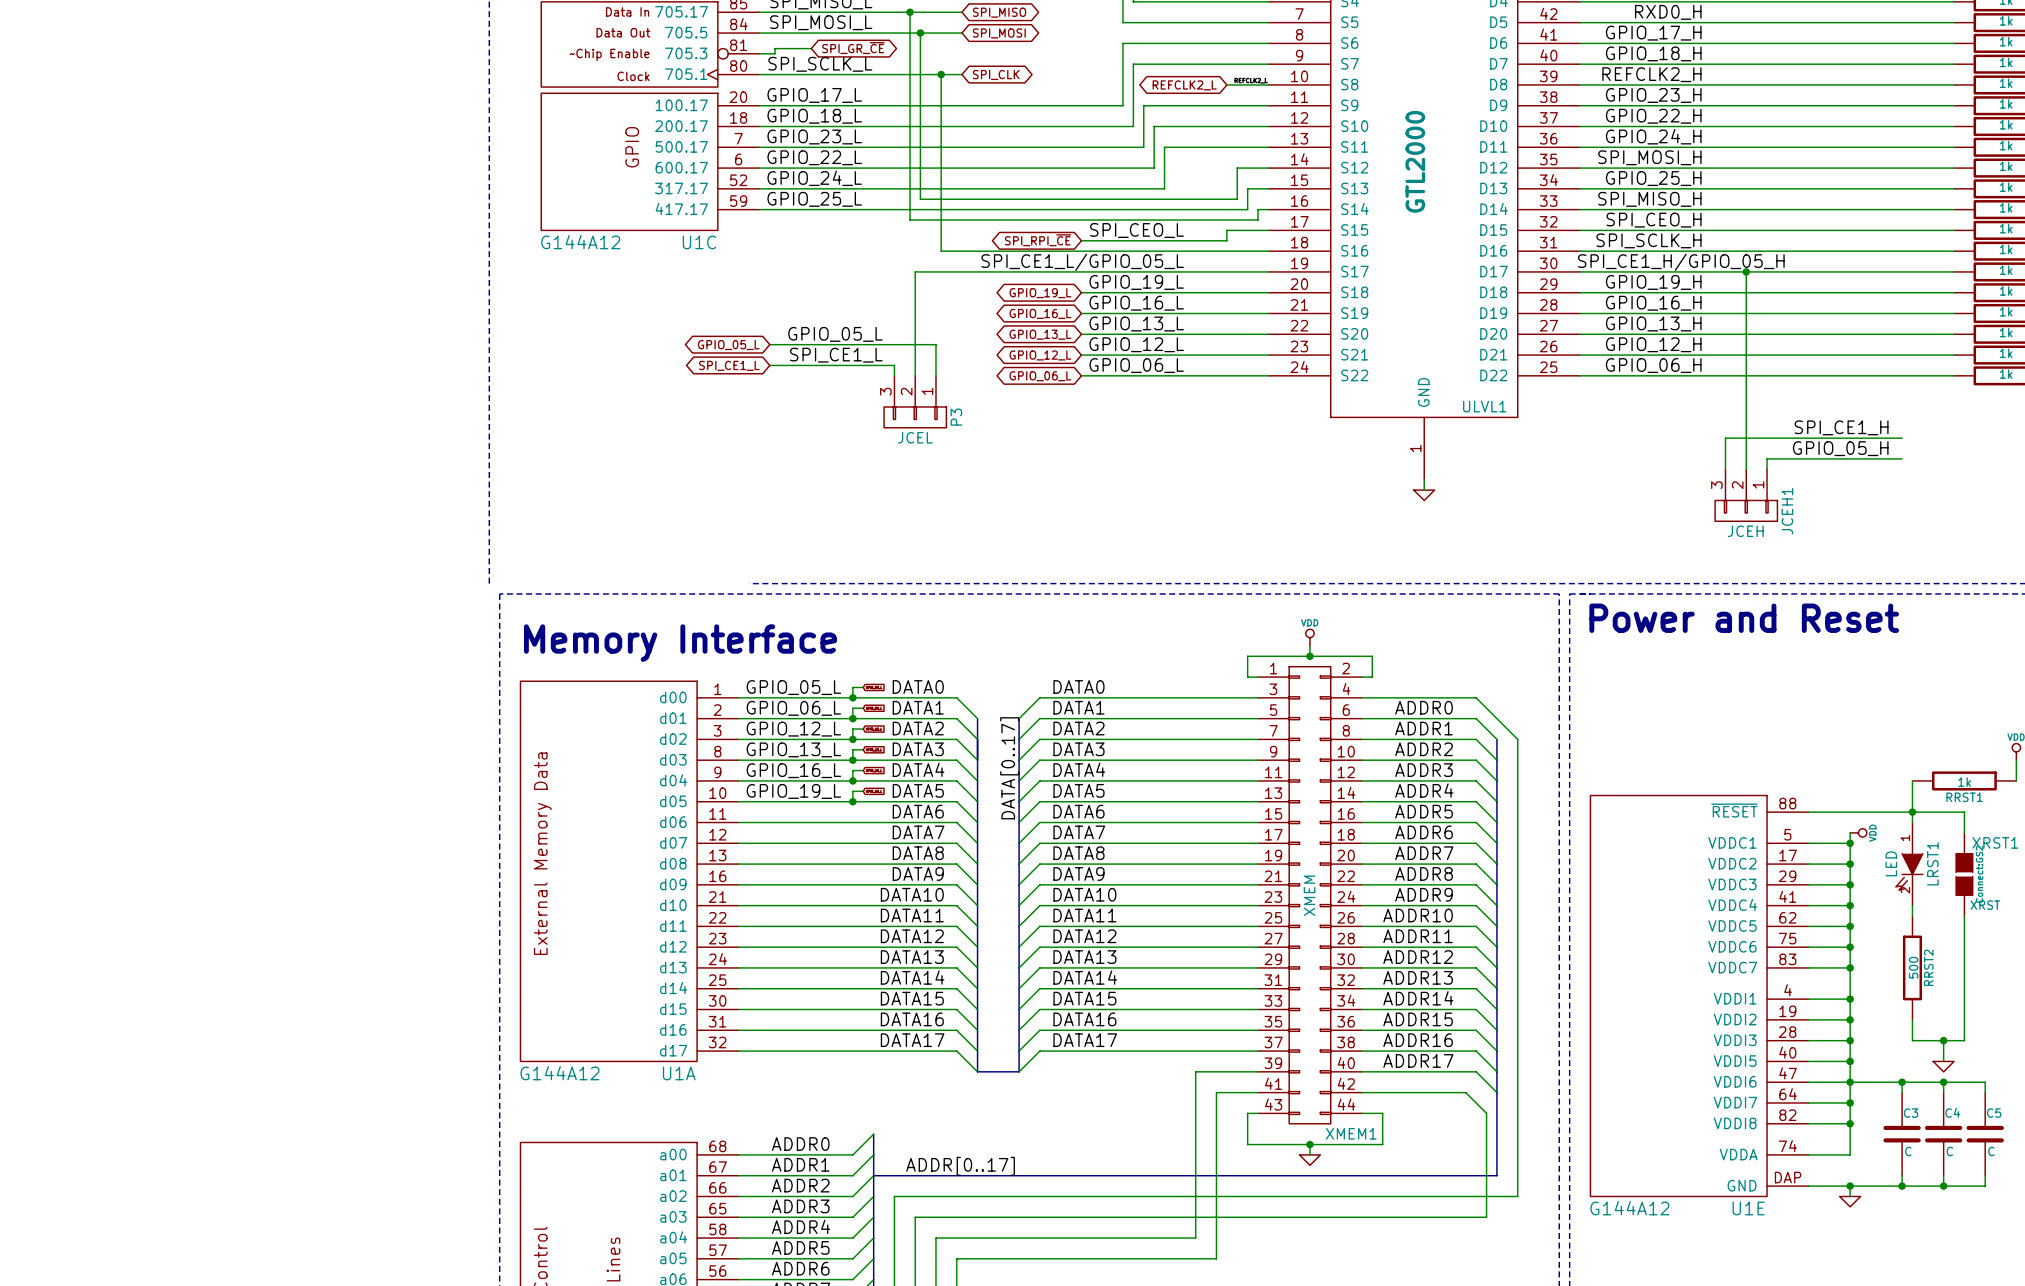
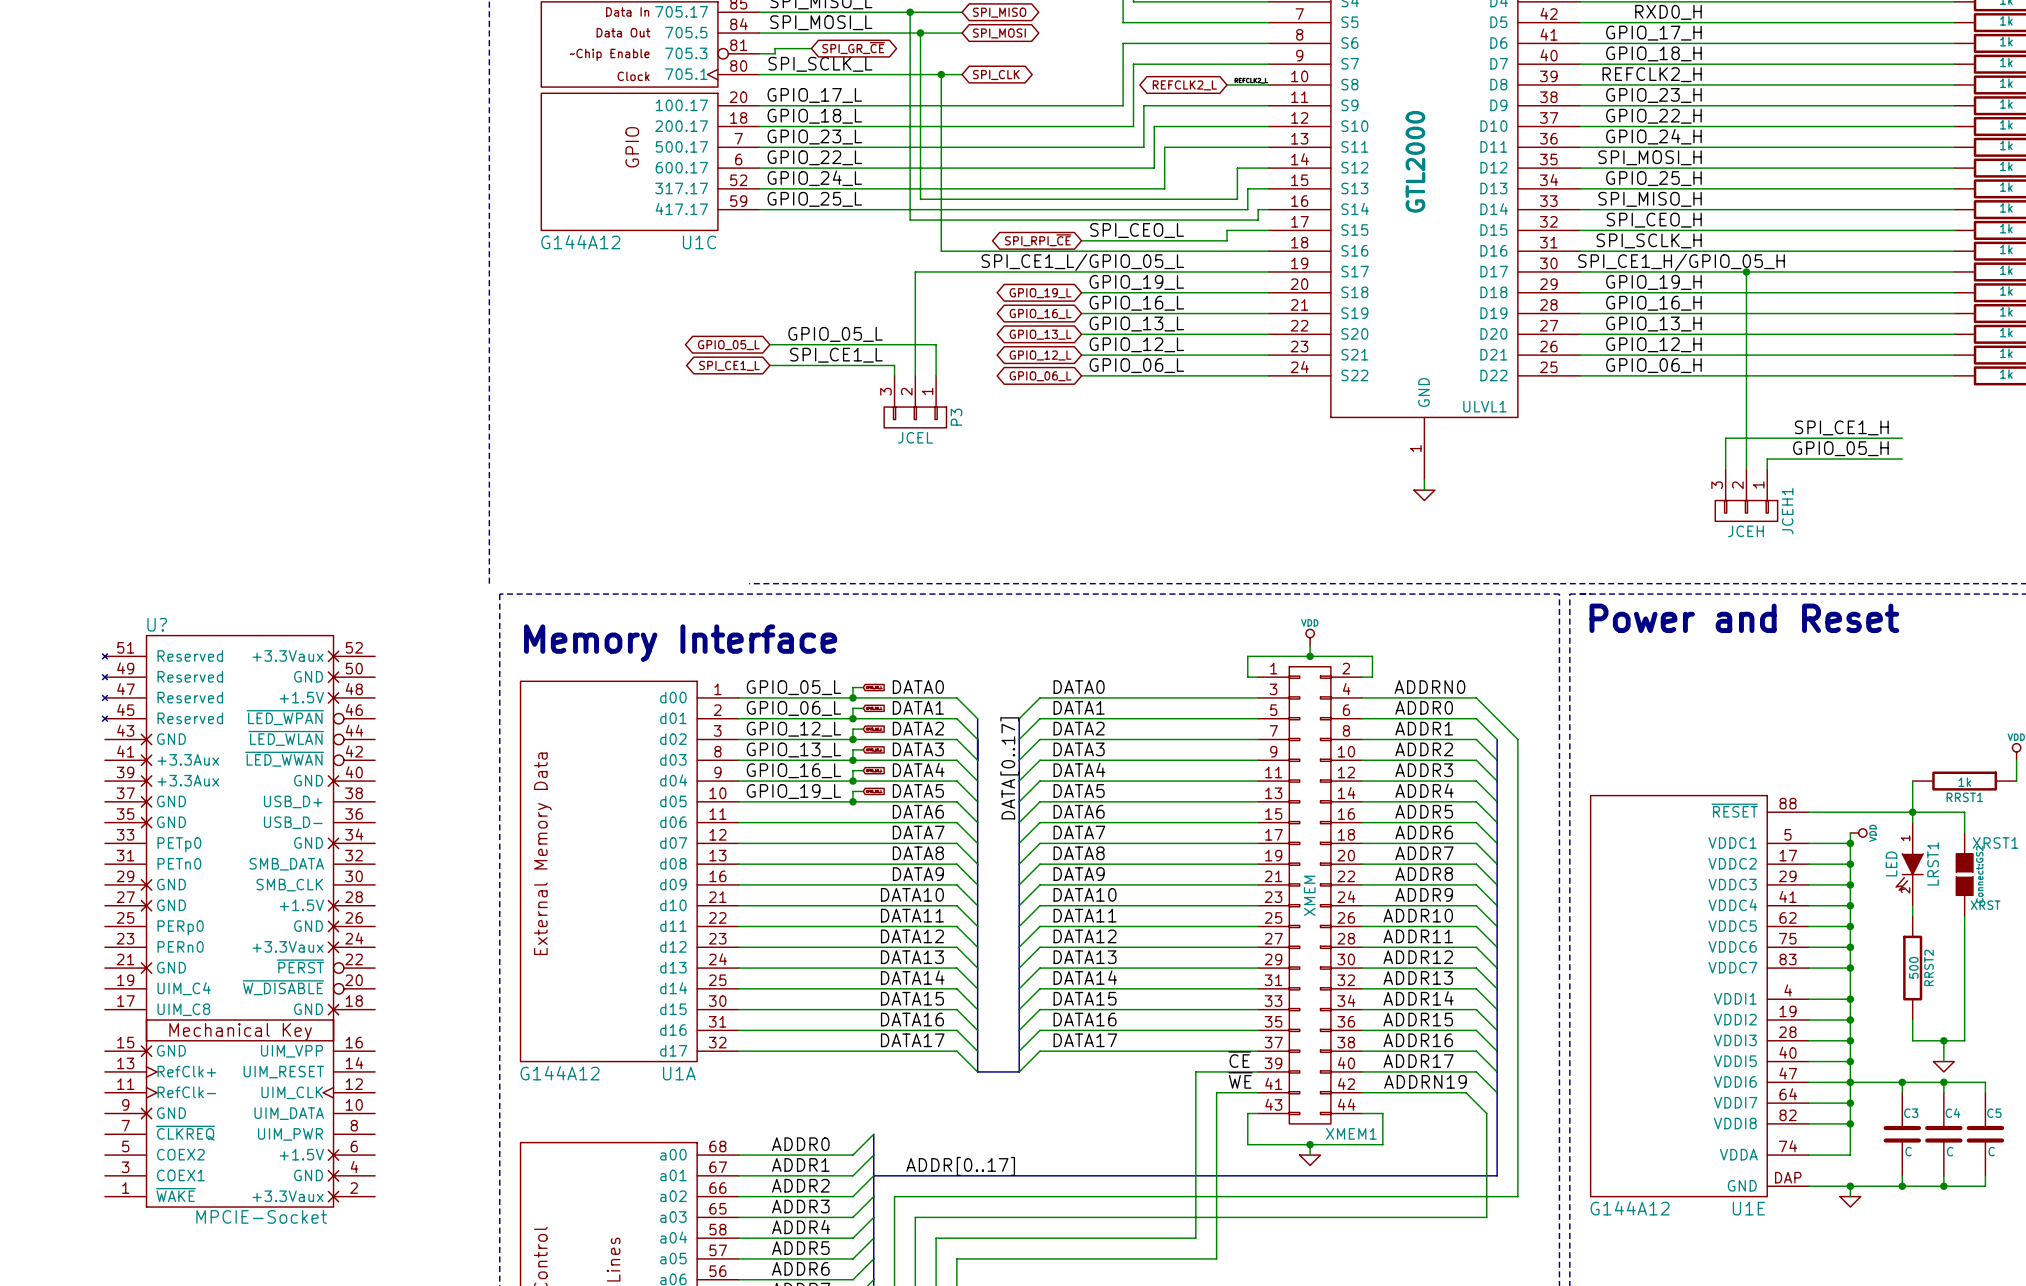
label: none -> ADDRN0 (1429, 687)
U?: none -> MPCIE-Socket (238, 921)
label: none -> ~{CE} (1239, 1059)
label: none -> ~{WE} (1240, 1080)
label: none -> ADDRN19 (1425, 1081)

